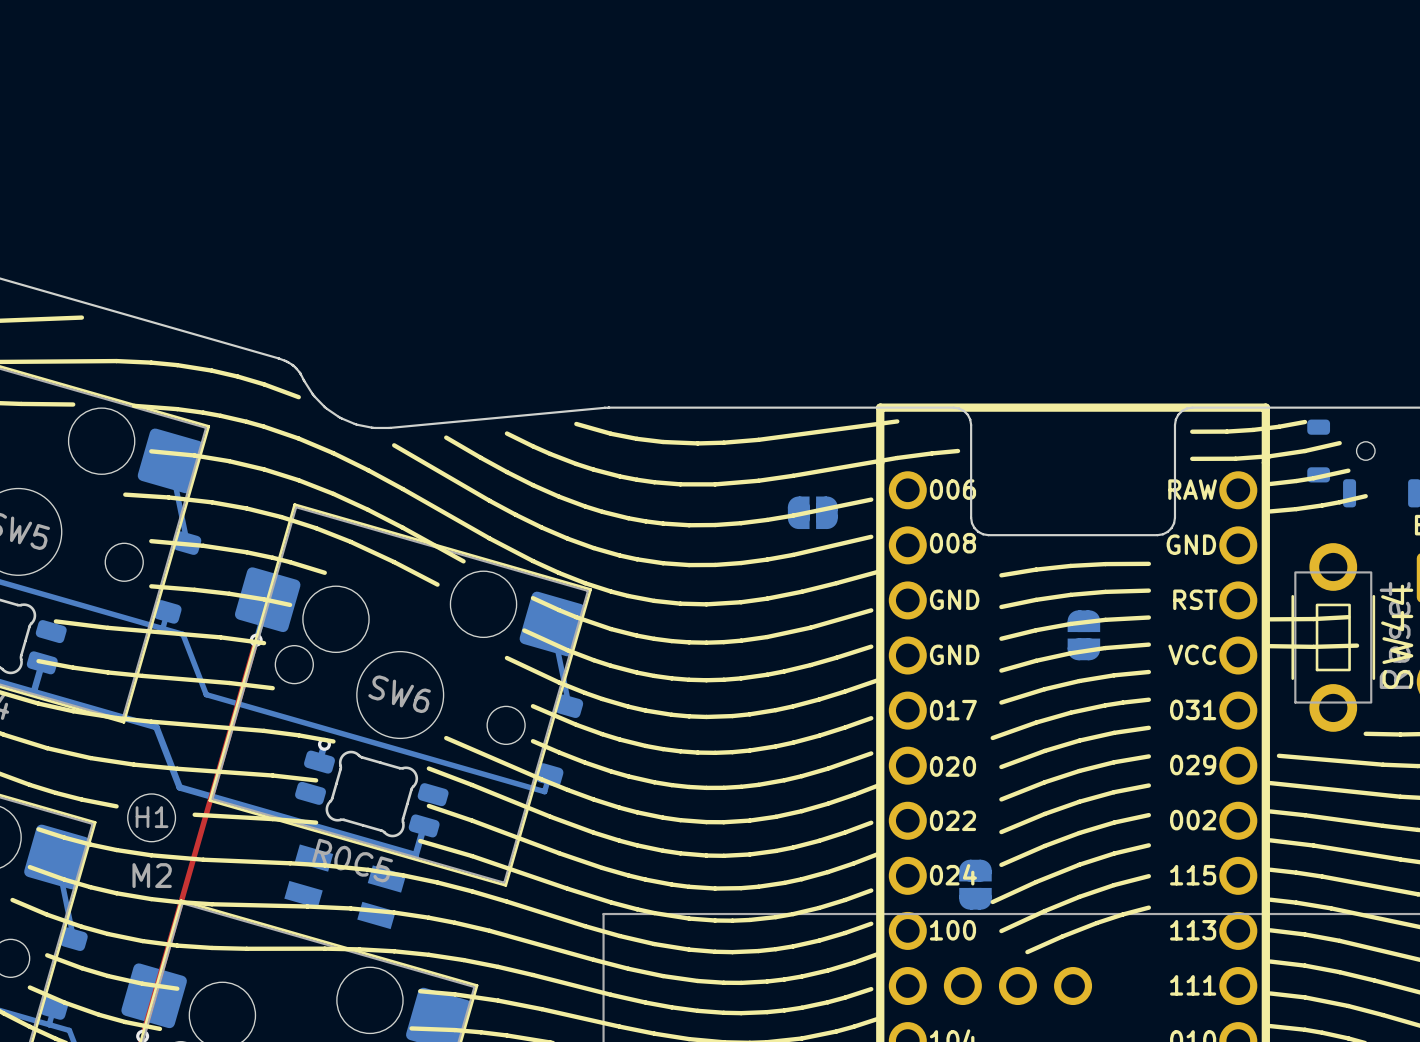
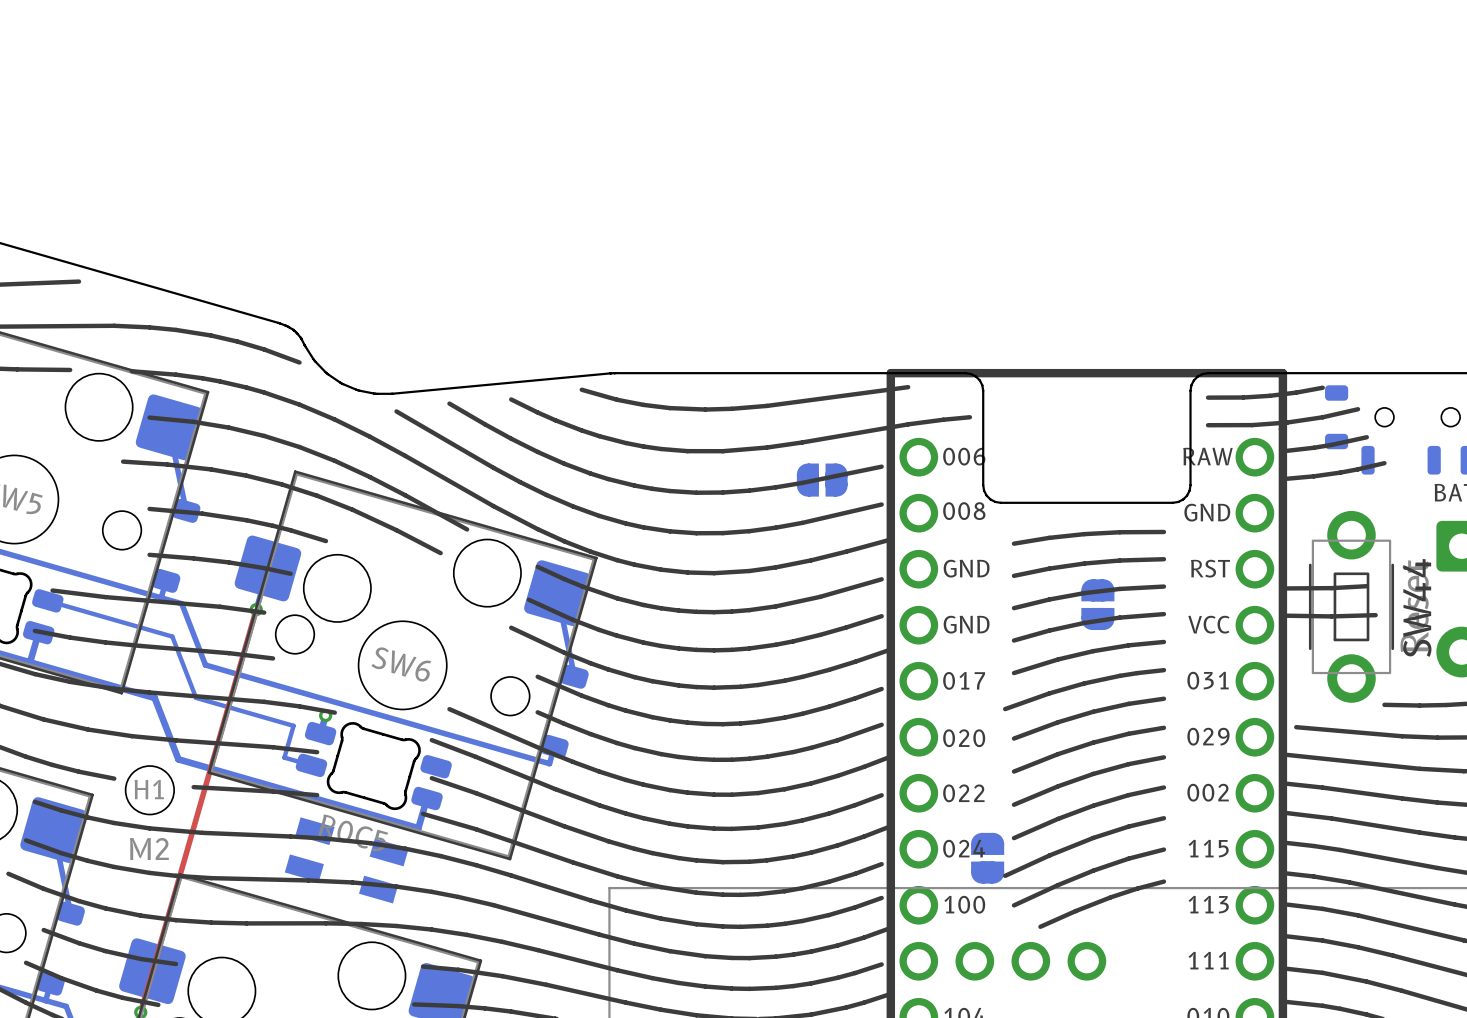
bottom track: none -> (47, 600) (172, 636) (196, 697) (293, 725) (284, 757) (311, 765)

